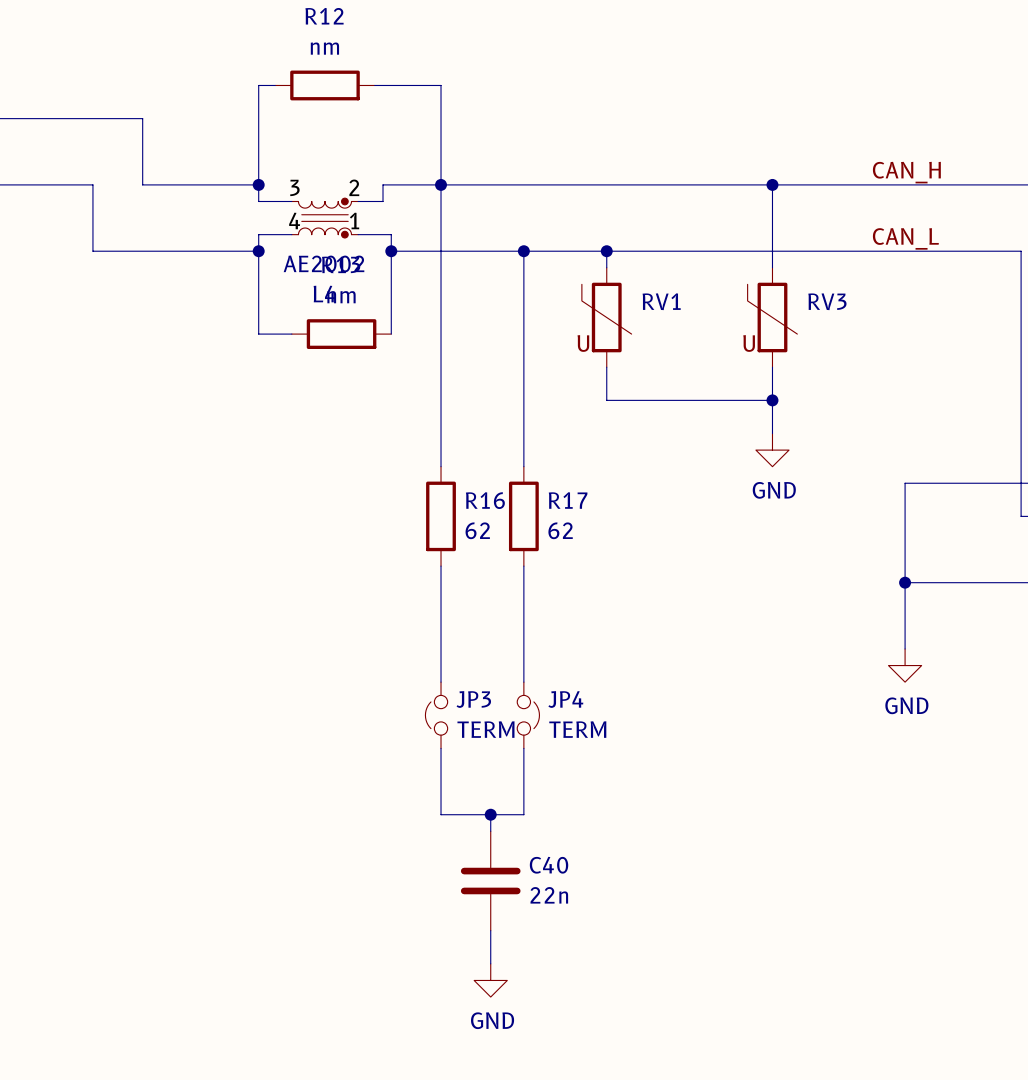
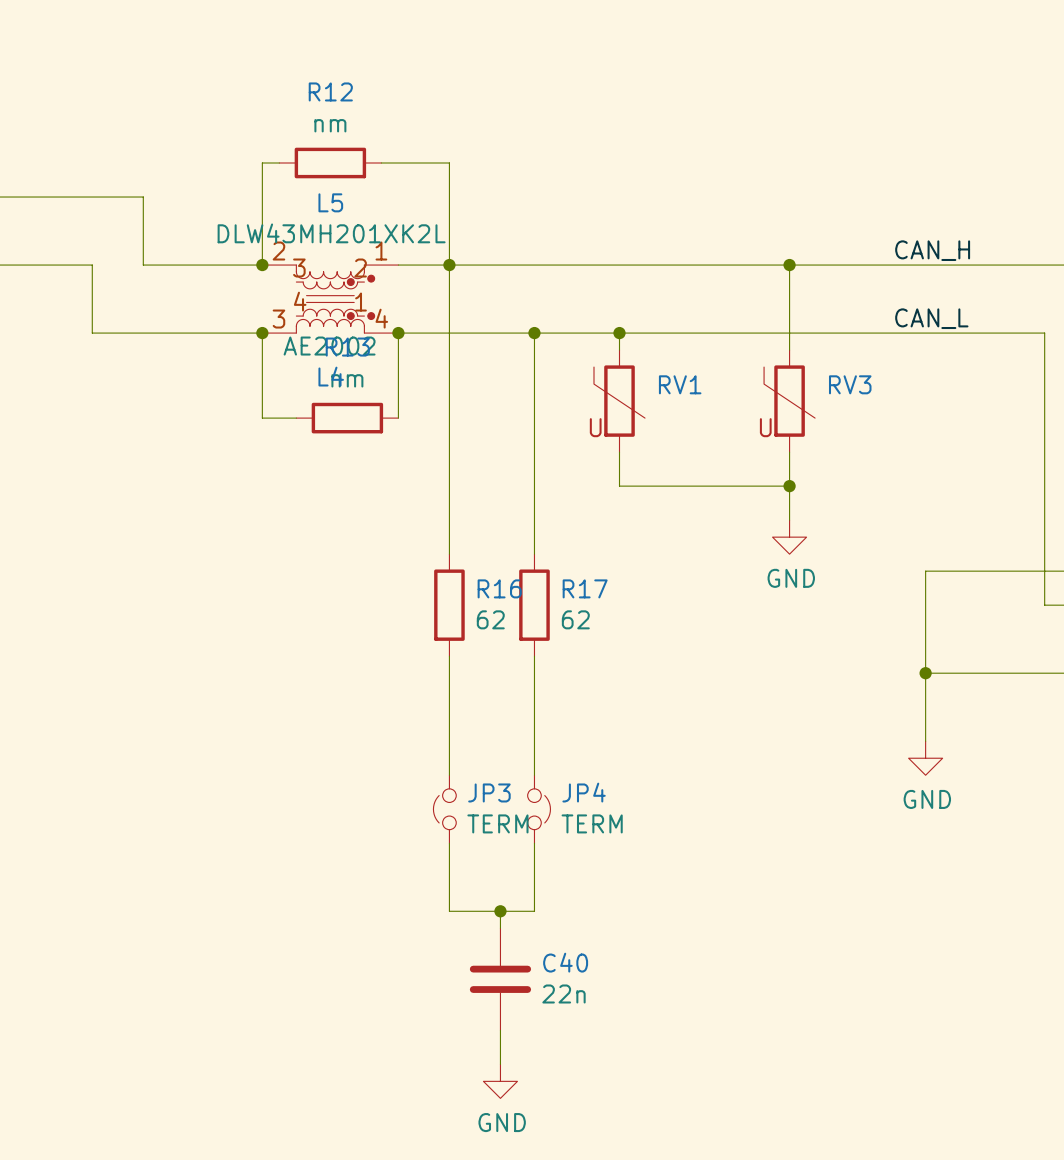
wire: (258, 184) (258, 201) (291, 201) -> none
wire: (391, 184) (383, 184) (383, 201) (358, 201) -> none
L5: none -> DLW43MH201XK2L (330, 299)
wire: (291, 234) (258, 234) (258, 251) -> none
wire: (358, 234) (391, 234) (391, 251) -> none

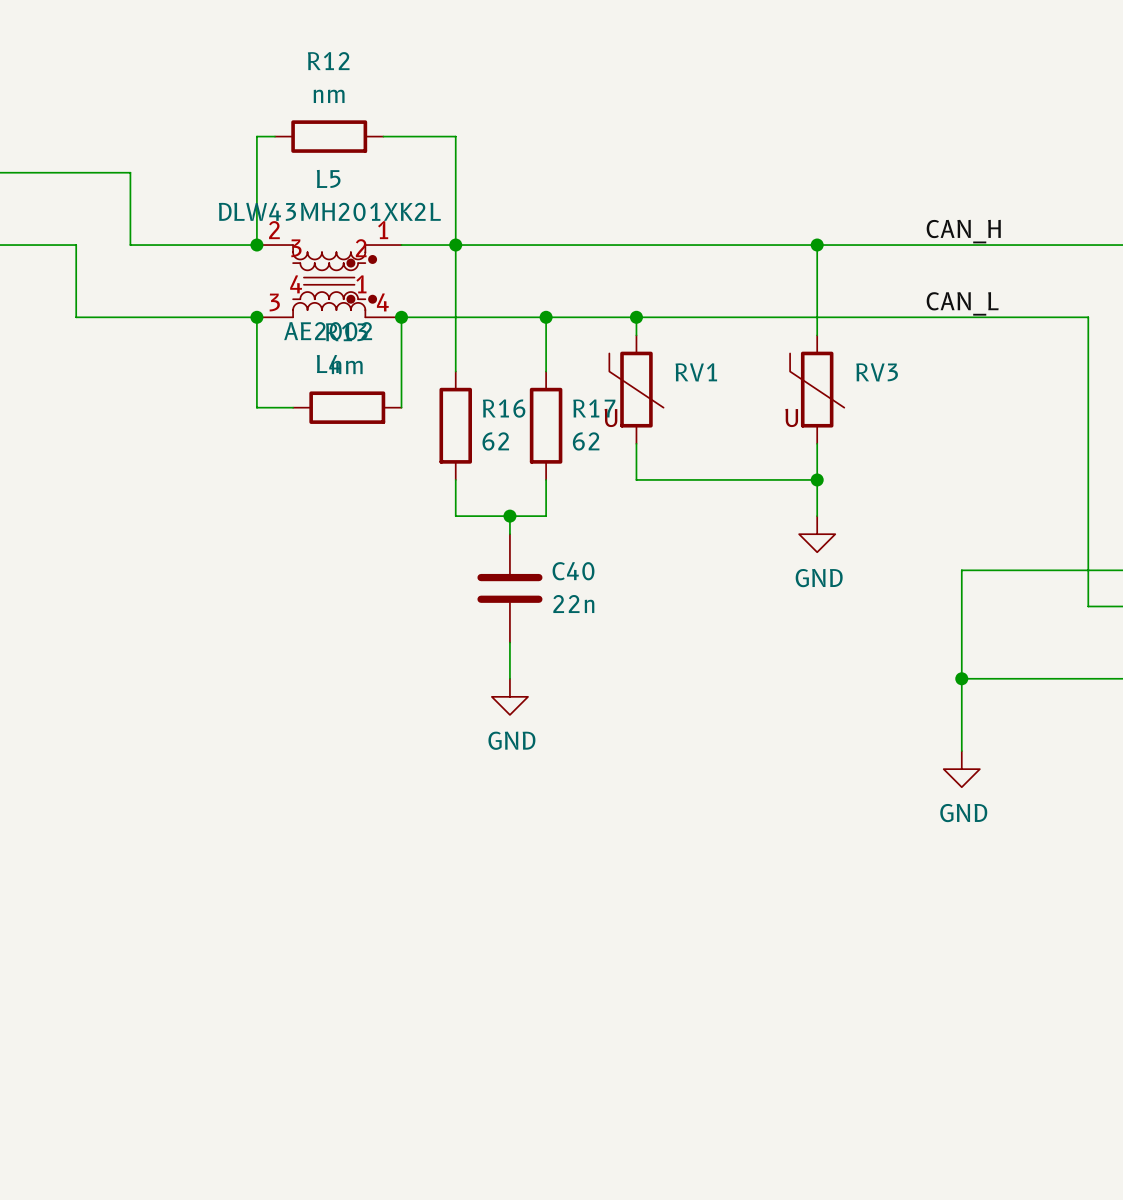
wire: (449, 384) (449, 486) -> none
wire: (534, 384) (534, 486) -> none
wire: (449, 520) (449, 554) -> (455, 516) (546, 516)
wire: none -> (509, 516) (509, 534)
junction: none -> (509, 516)
wire: (534, 520) (534, 554) -> (509, 642) (509, 678)
R16 position: (449, 605) -> (455, 425)
R17 position: (534, 605) -> (546, 425)
wire: (449, 656) (449, 775) -> none
wire: (534, 656) (534, 775) -> none
power symbol: none -> GND (509, 696)
JP3: TERM (444, 809) -> none
JP4: TERM (539, 809) -> none
wire: (449, 843) (449, 911) (534, 911) (534, 843) -> none
wire: (500, 911) (500, 928) -> none
junction: (500, 911) -> none
C40 position: (500, 979) -> (509, 588)
wire: (500, 1030) (500, 1064) -> none
power symbol: GND (500, 1081) -> none

